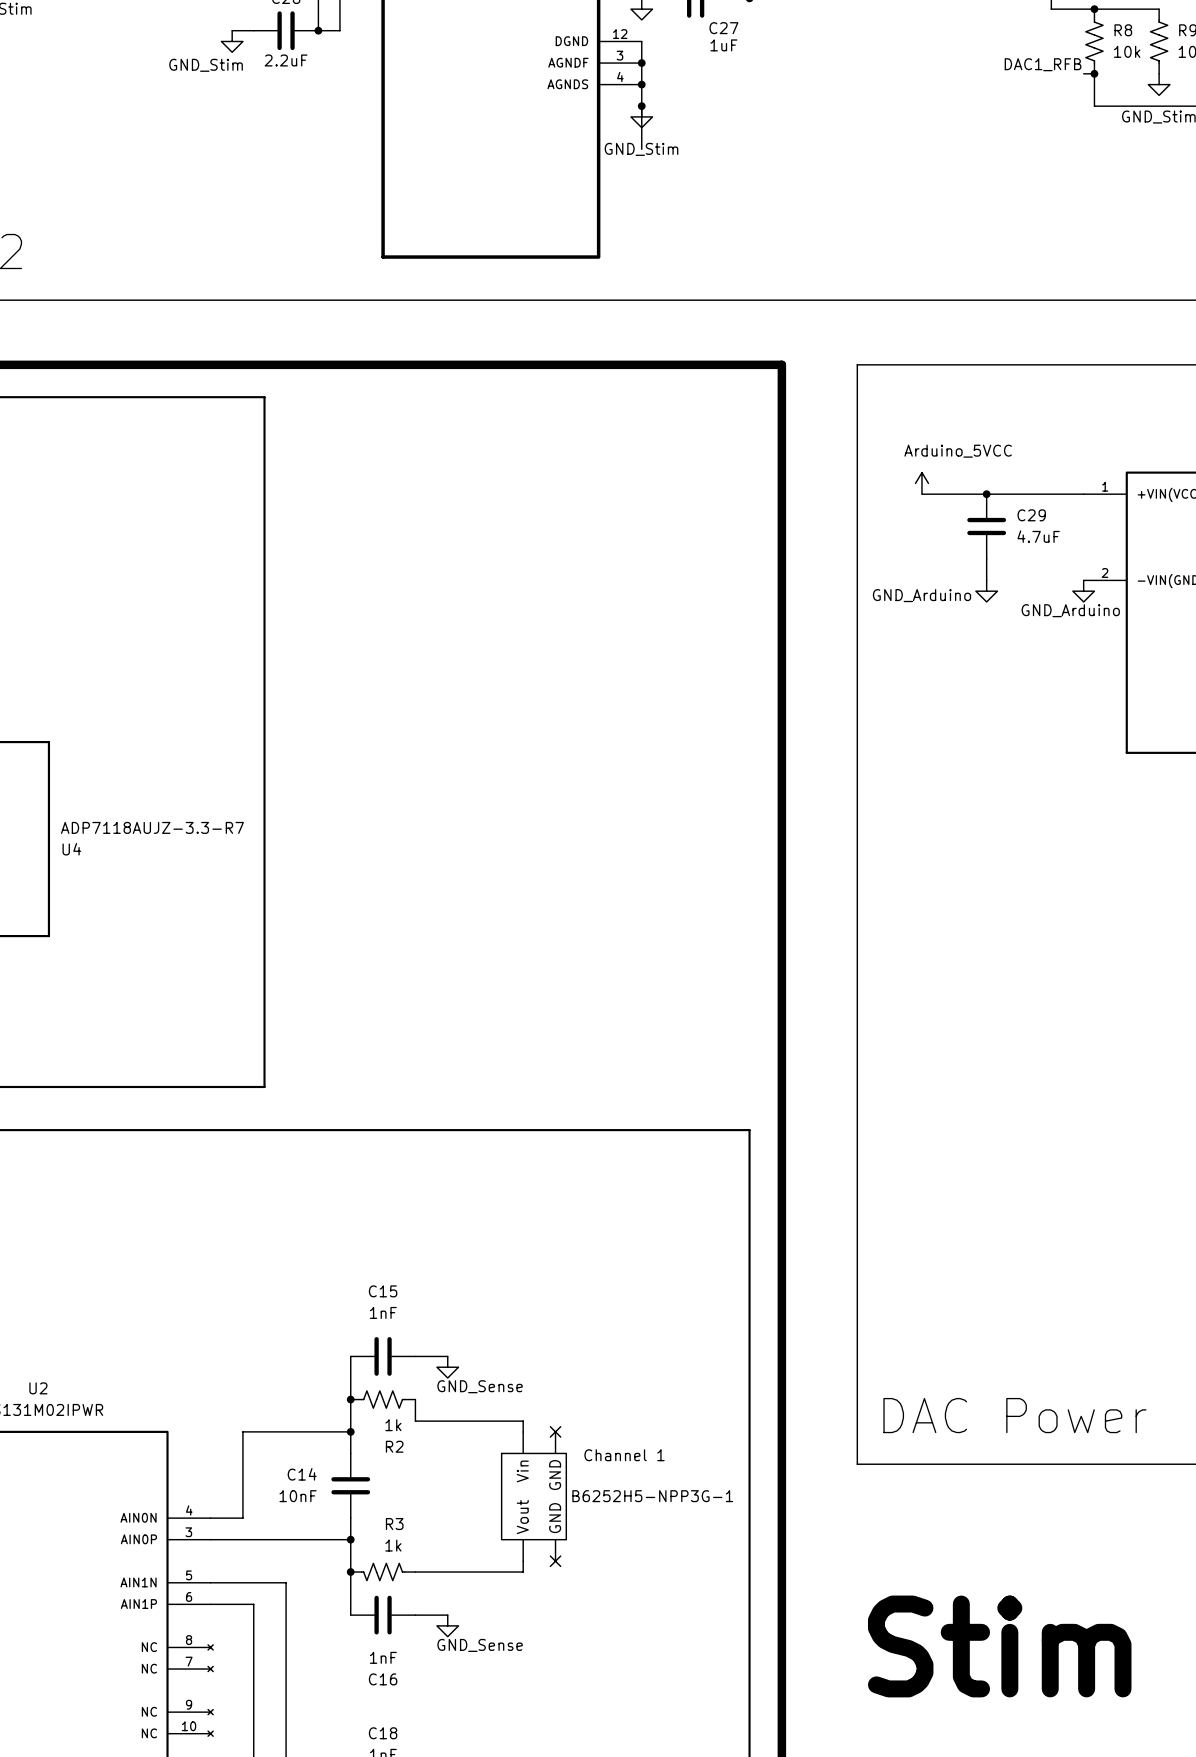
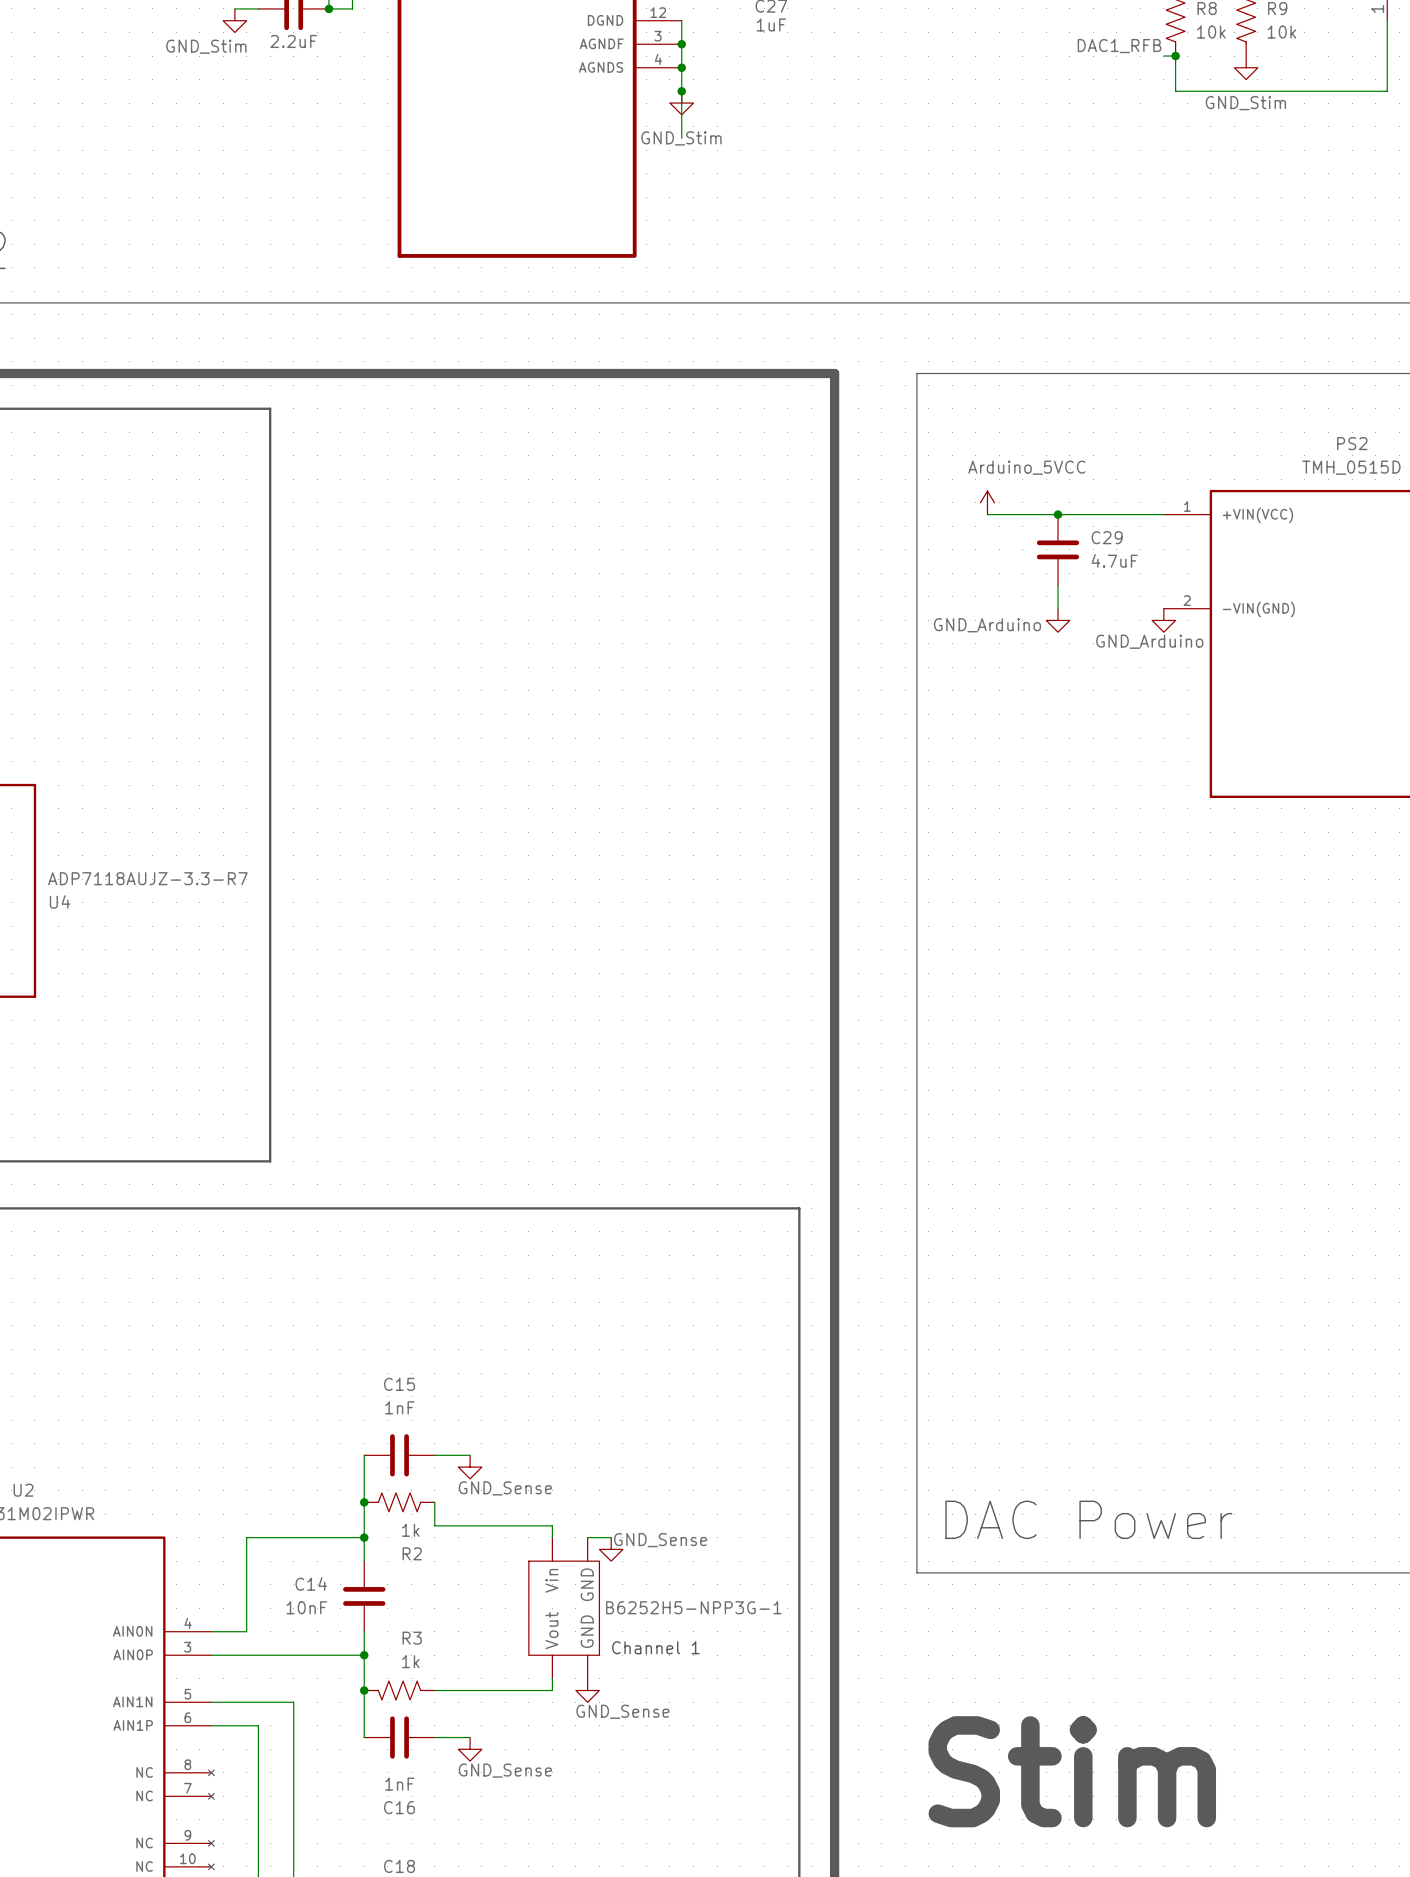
wire: none -> (587, 1537) (611, 1537)
no-connect mark: (555, 1431) -> none
power symbol: none -> GND_Sense (611, 1549)
text position: Channel 1 (624, 1455) -> Channel 1 (655, 1647)
no-connect mark: (555, 1561) -> none
power symbol: none -> GND_Sense (587, 1690)

